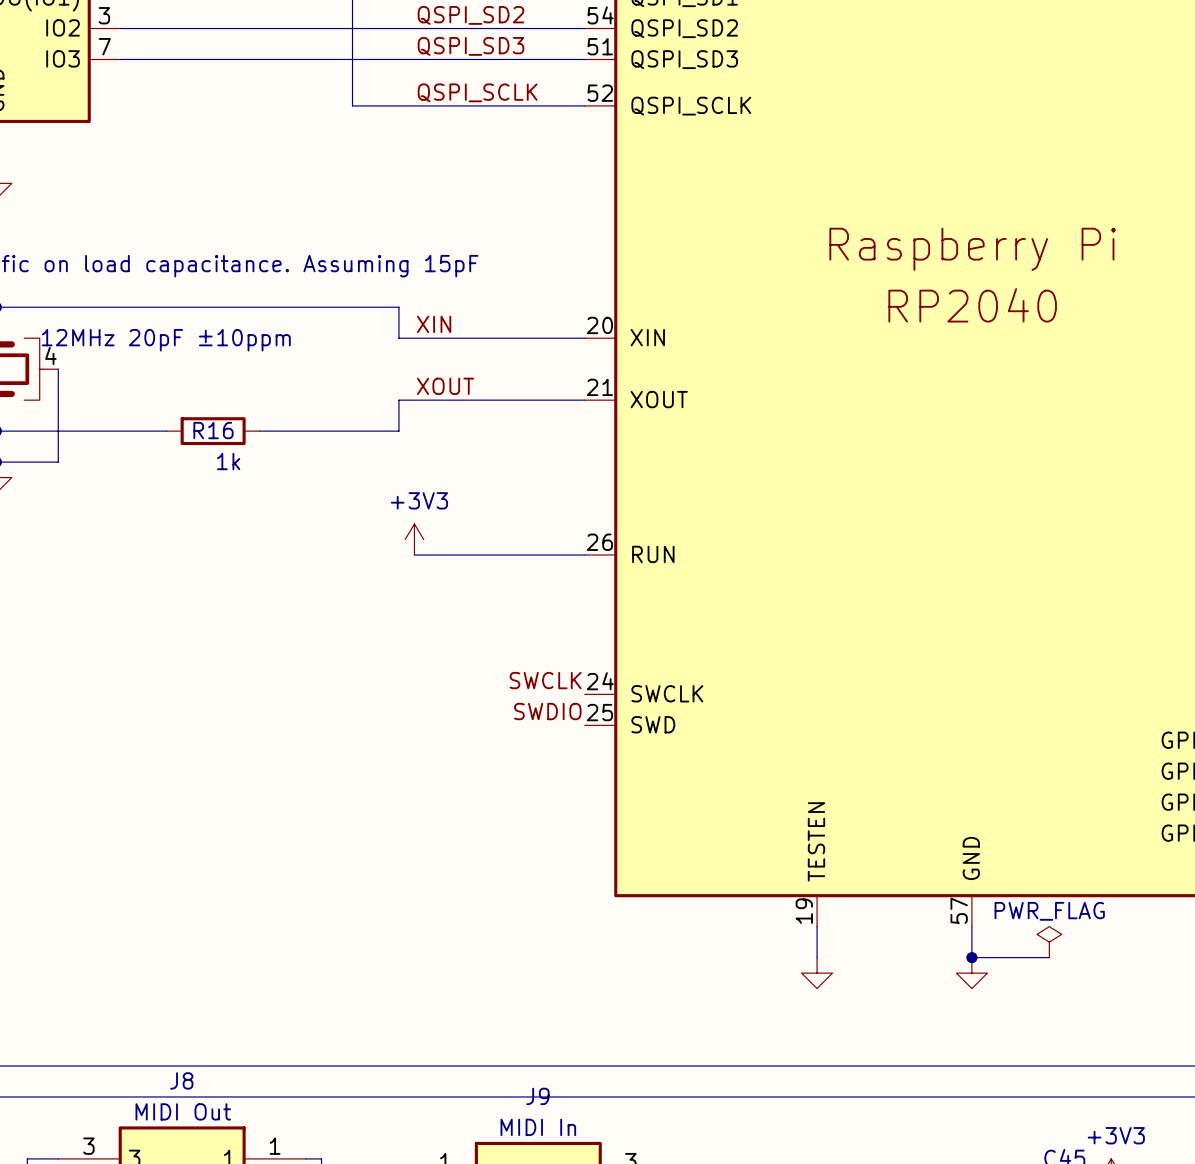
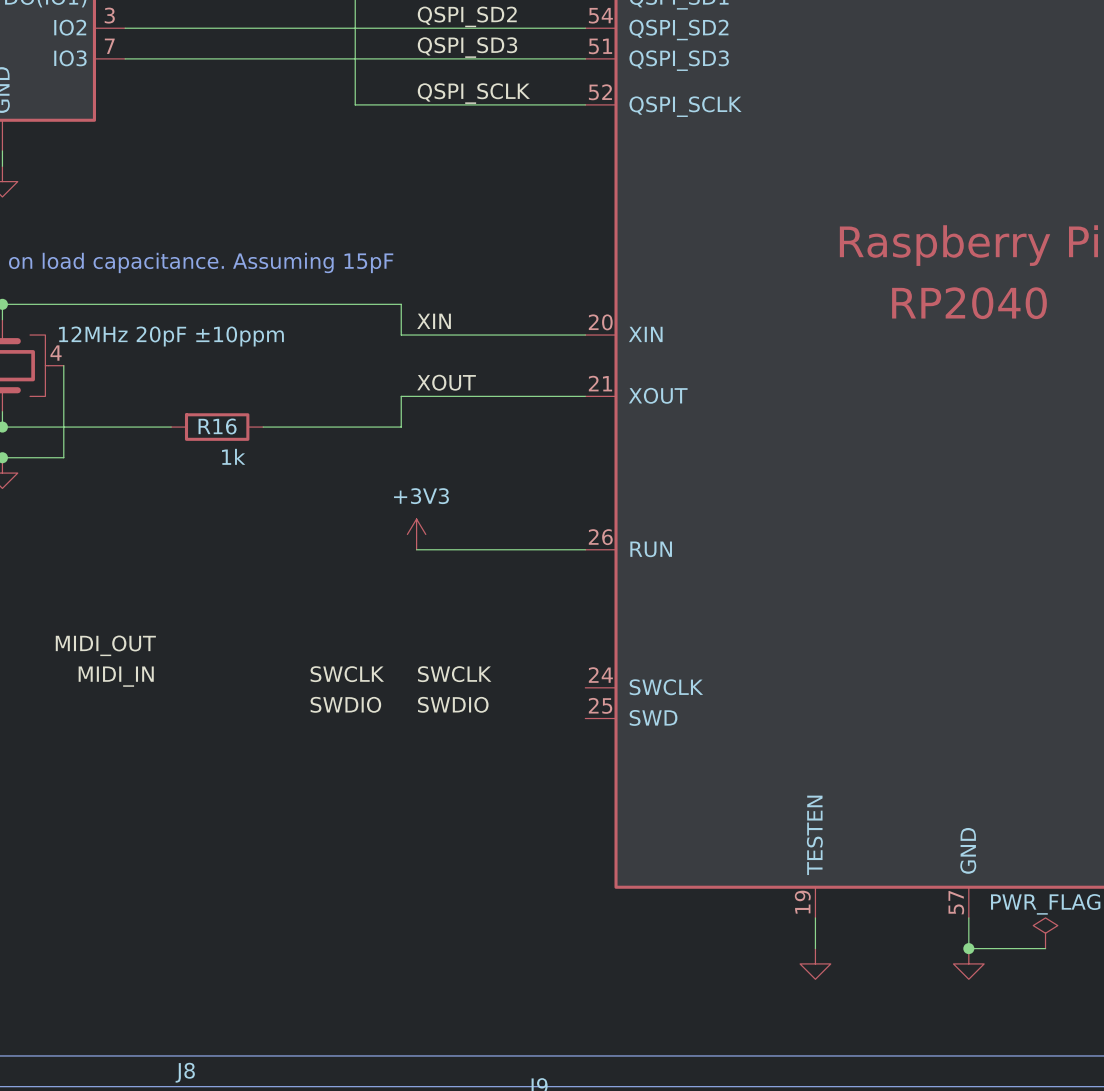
label: none -> MIDI_OUT (105, 645)
label: none -> SWCLK (347, 674)
label position: SWCLK (545, 680) -> SWCLK (454, 674)
label: none -> MIDI_IN (116, 676)
label: none -> SWDIO (345, 704)
label position: SWDIO (547, 711) -> SWDIO (453, 704)

